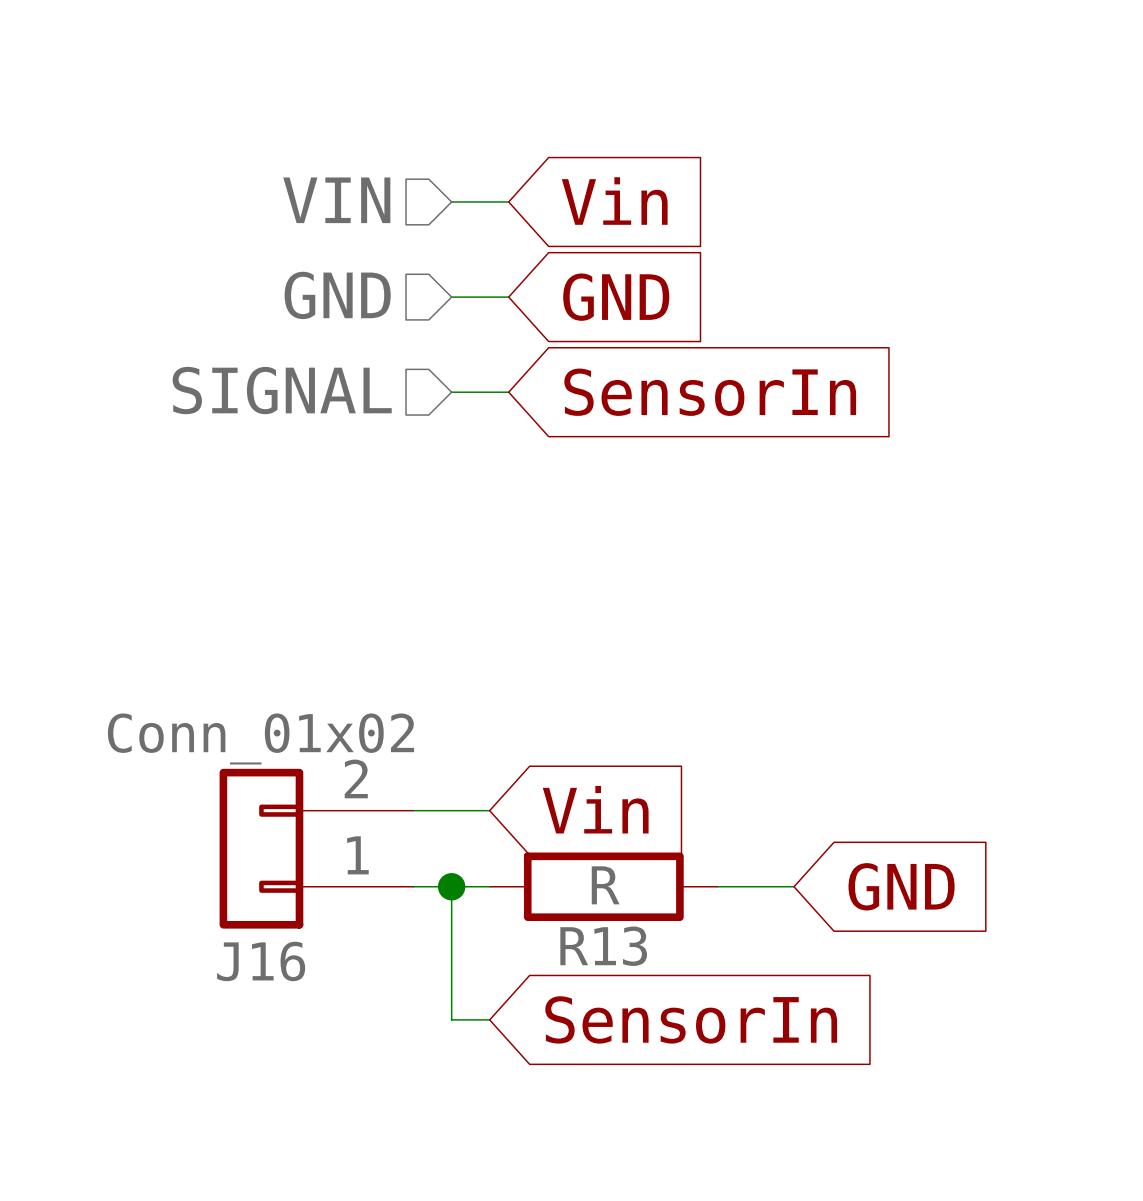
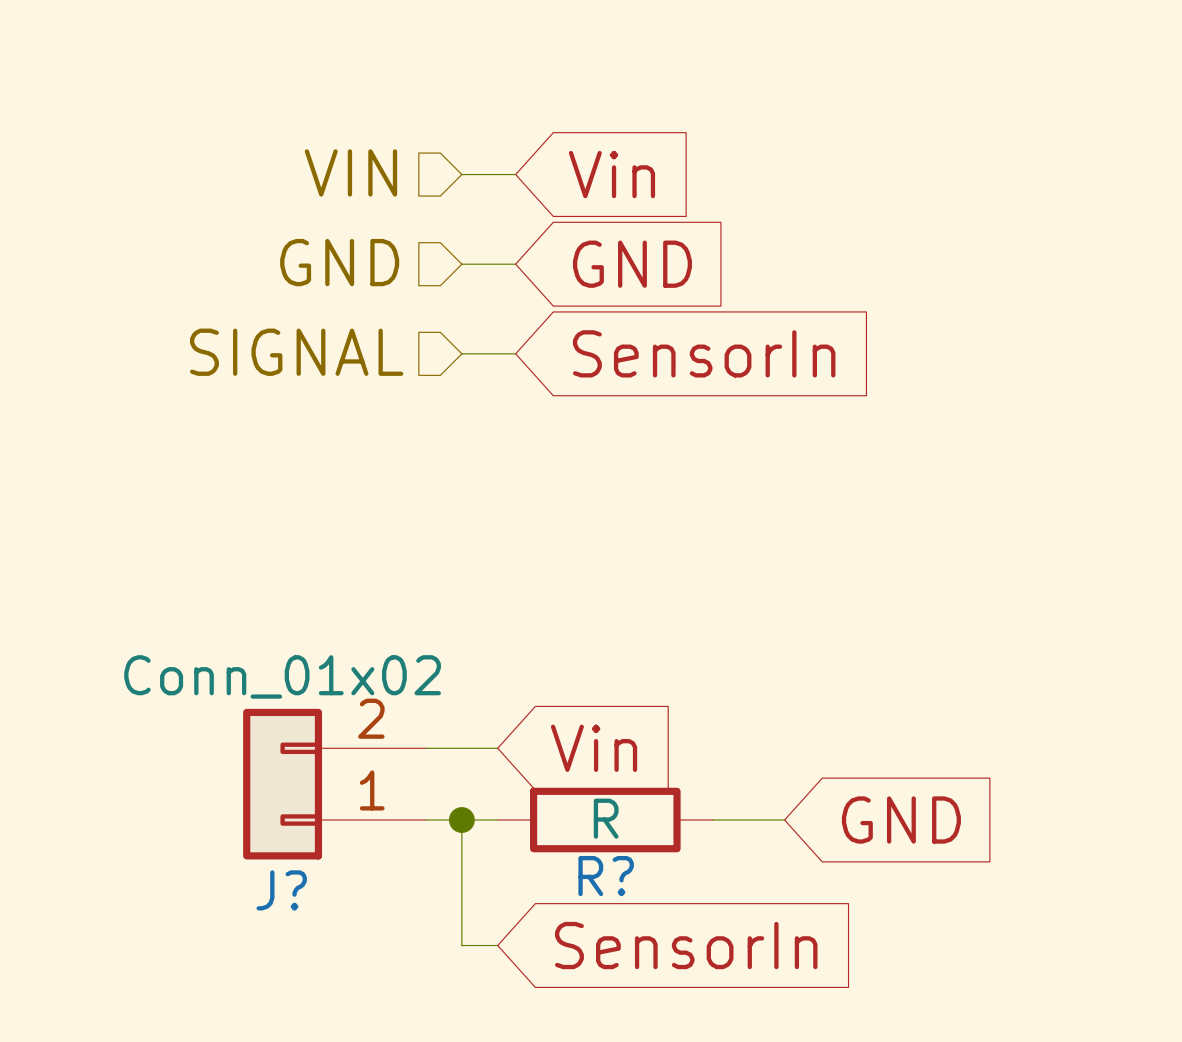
R13 name: R13 (603, 946) -> R? (606, 876)
J16 name: J16 (261, 961) -> J? (281, 890)

